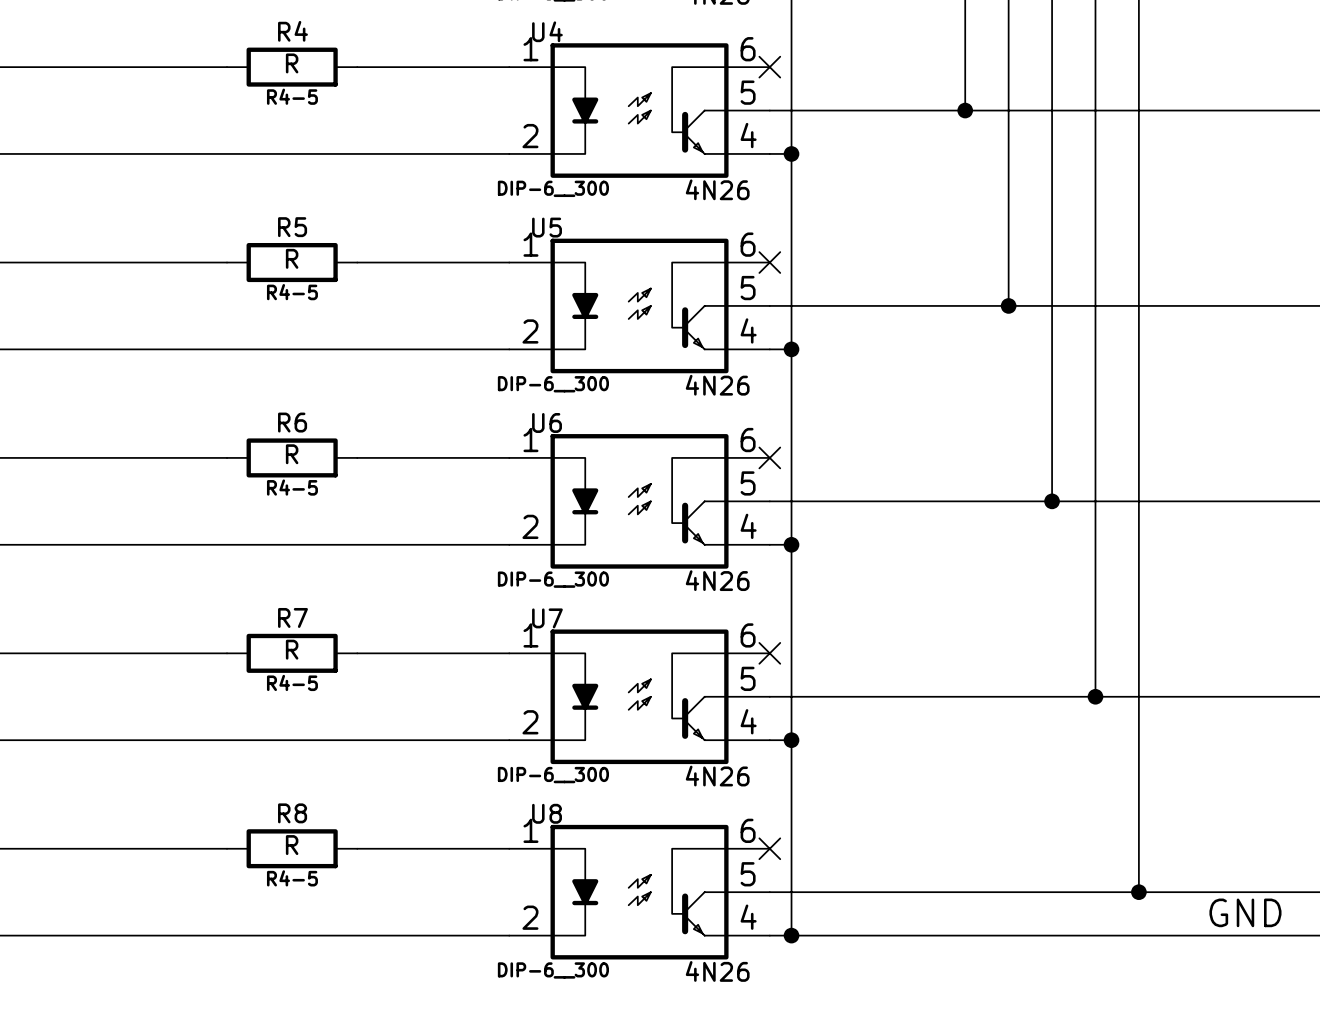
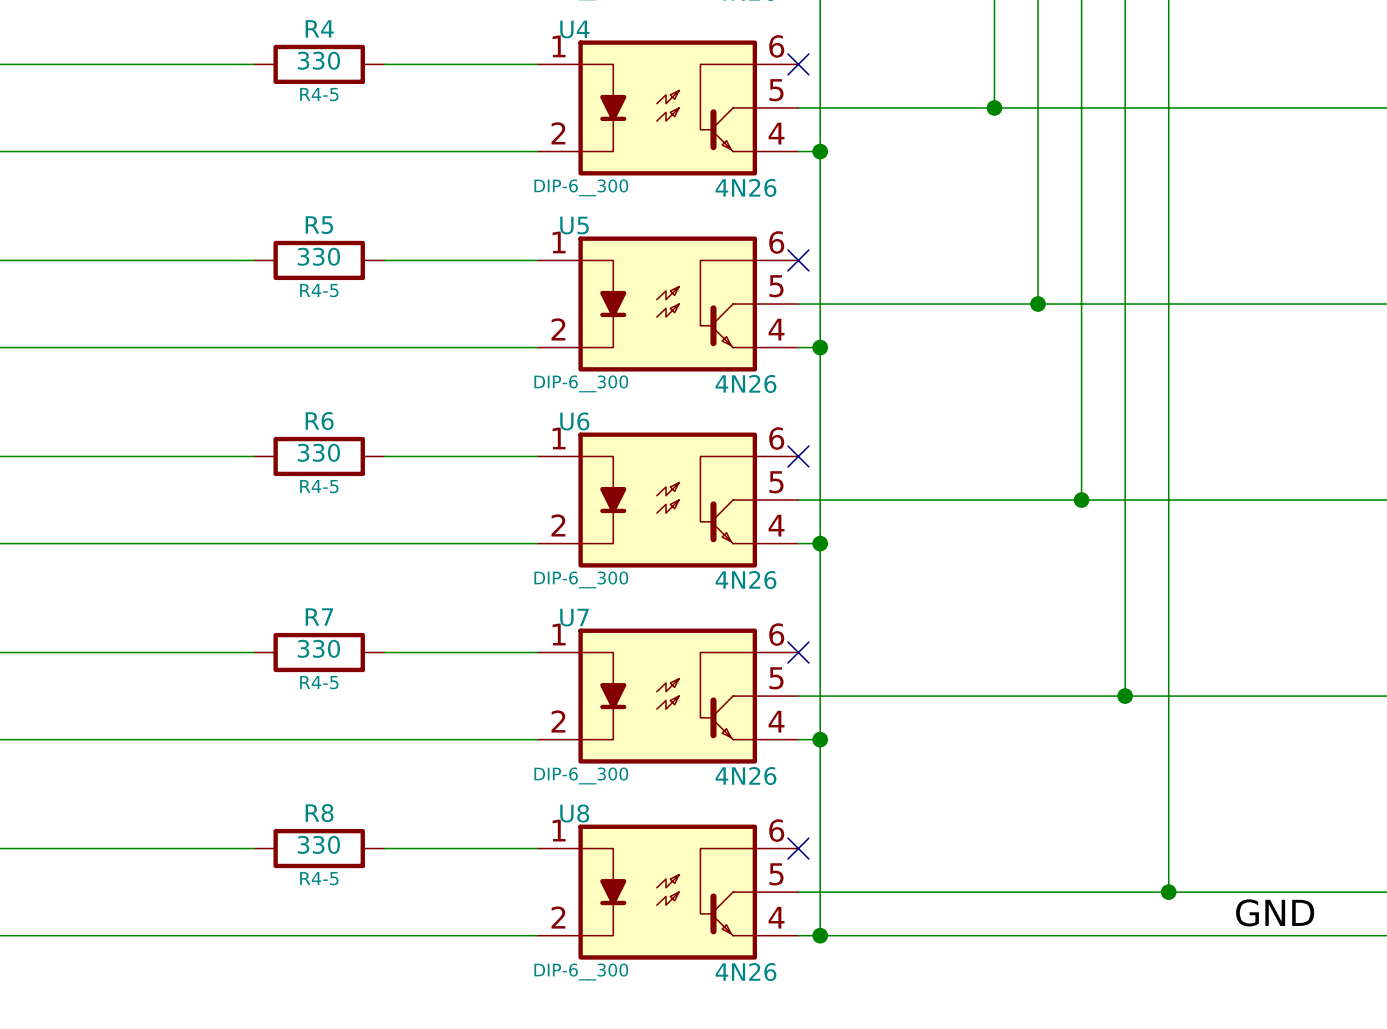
R4 value: R (292, 63) -> 330 (318, 60)
R5 value: R (292, 258) -> 330 (318, 256)
R6 value: R (292, 454) -> 330 (318, 452)
R7 value: R (292, 649) -> 330 (318, 648)
R8 value: R (292, 845) -> 330 (318, 844)

